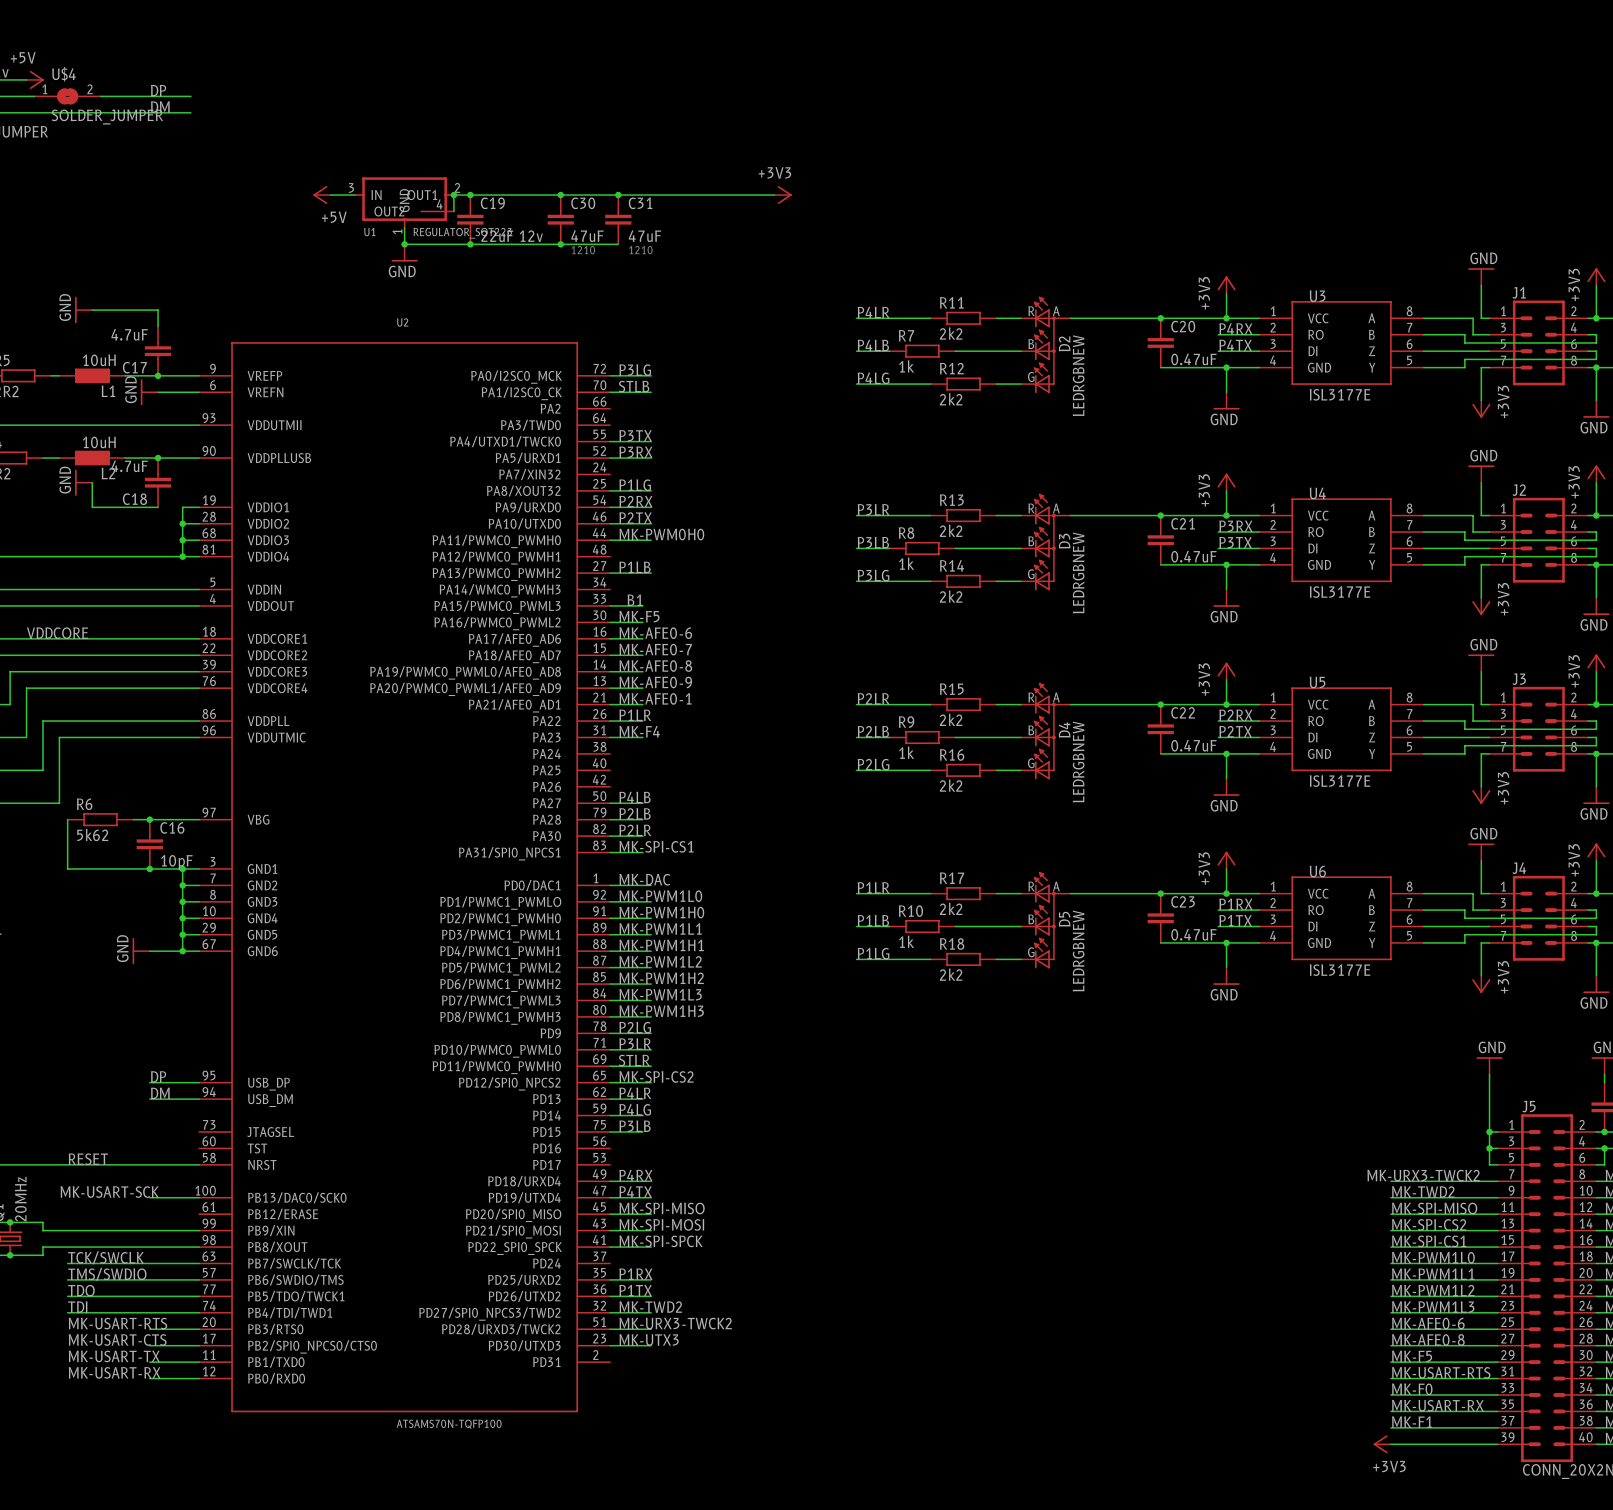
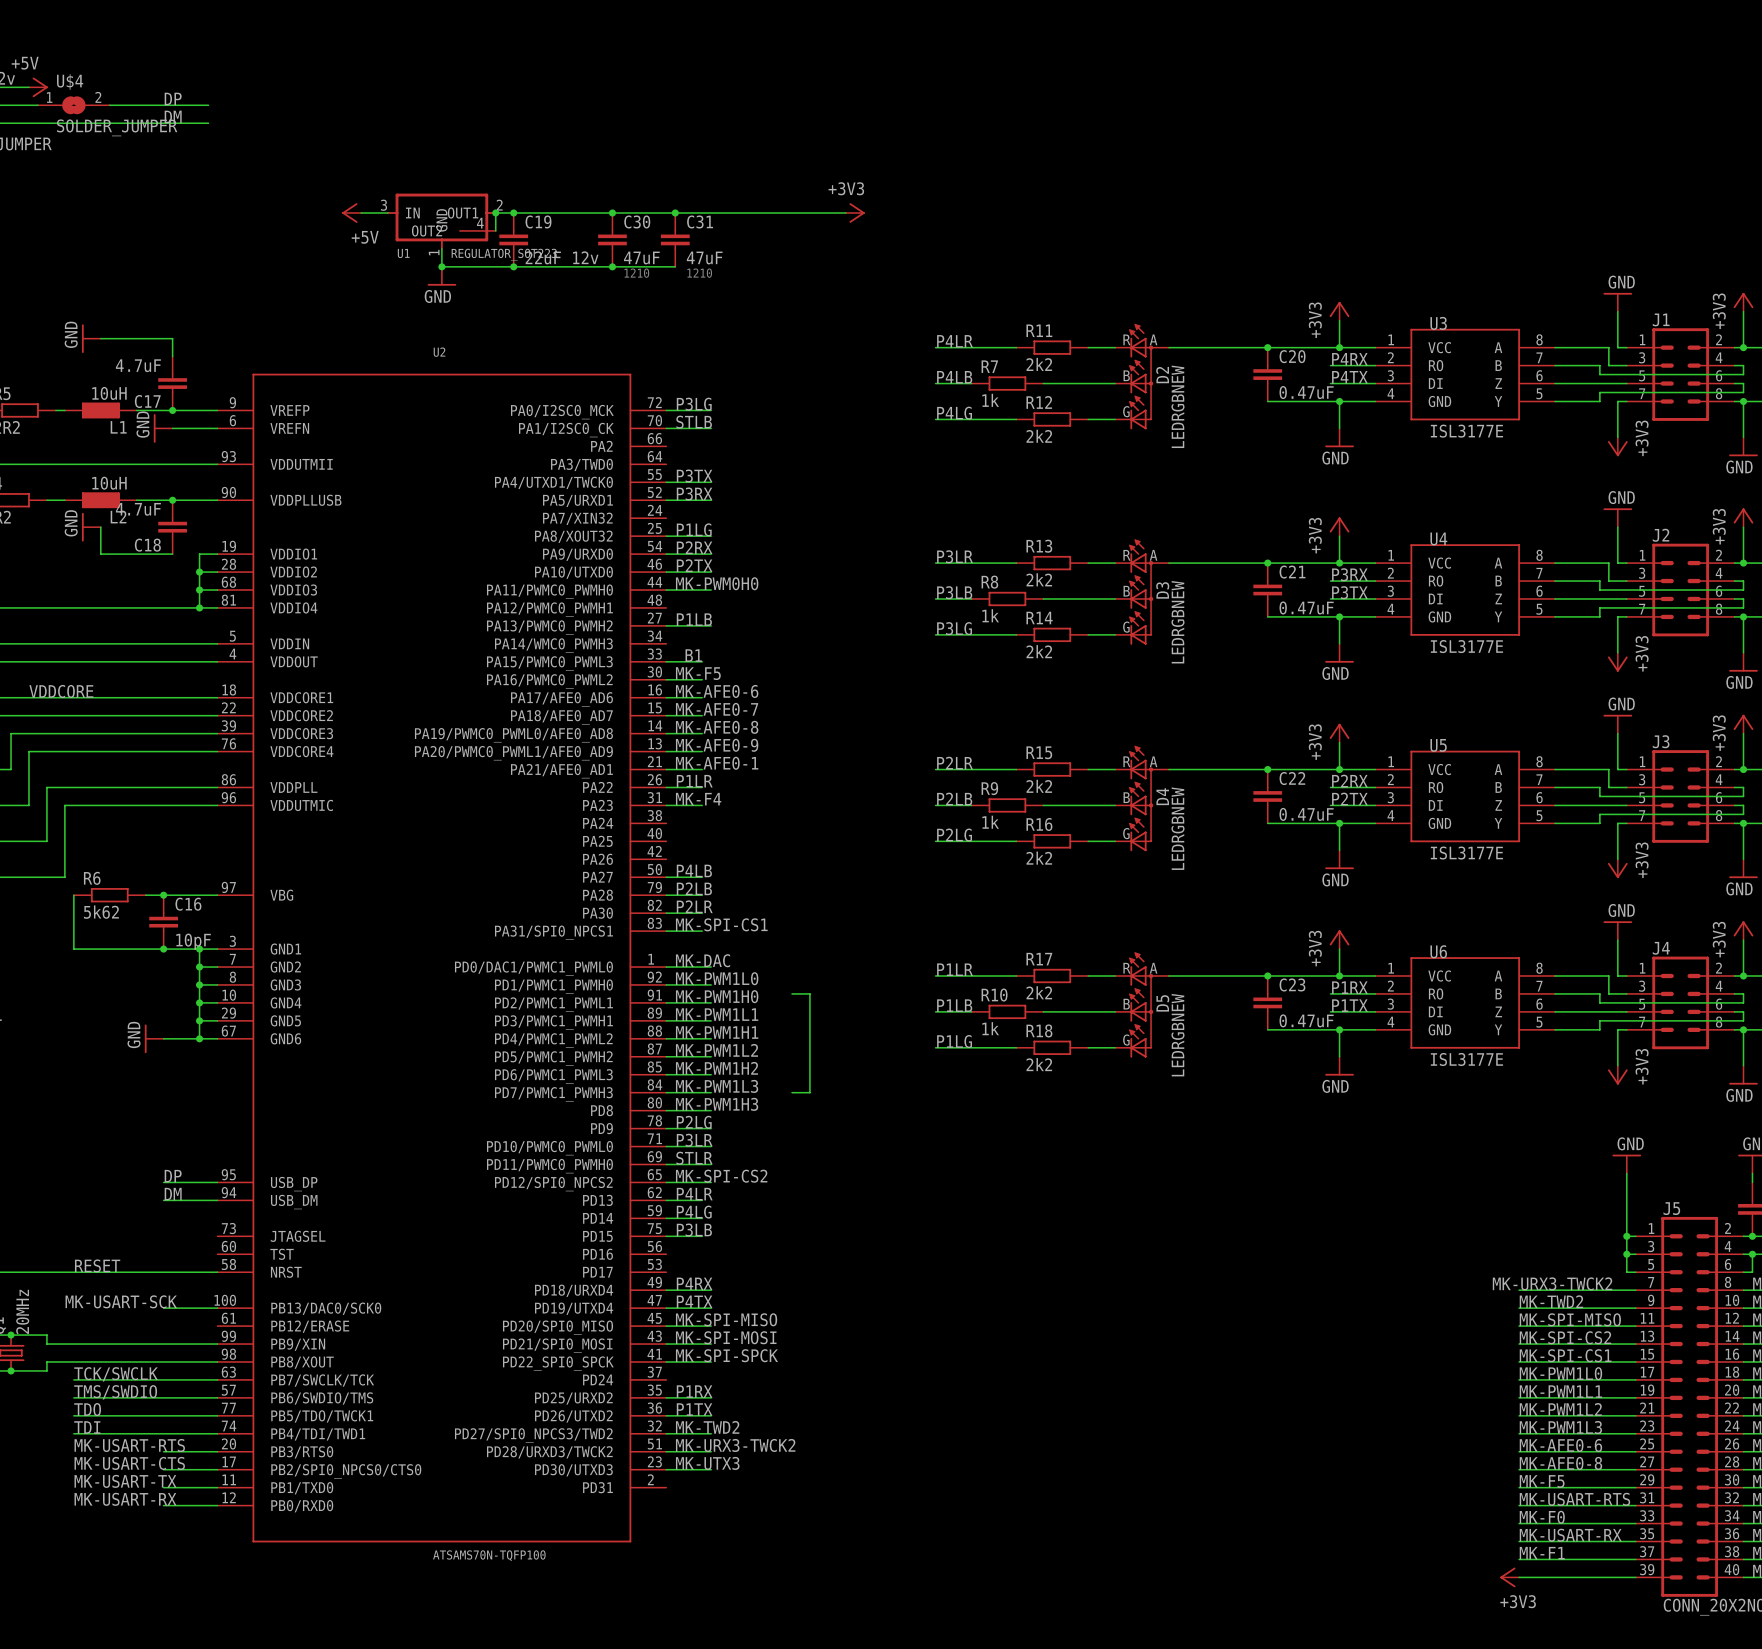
U2 symbol: [199, 342, 611, 1413] -> [217, 373, 667, 1543]
wire: none -> (791, 993) (809, 993) (809, 1092) (791, 1092)

